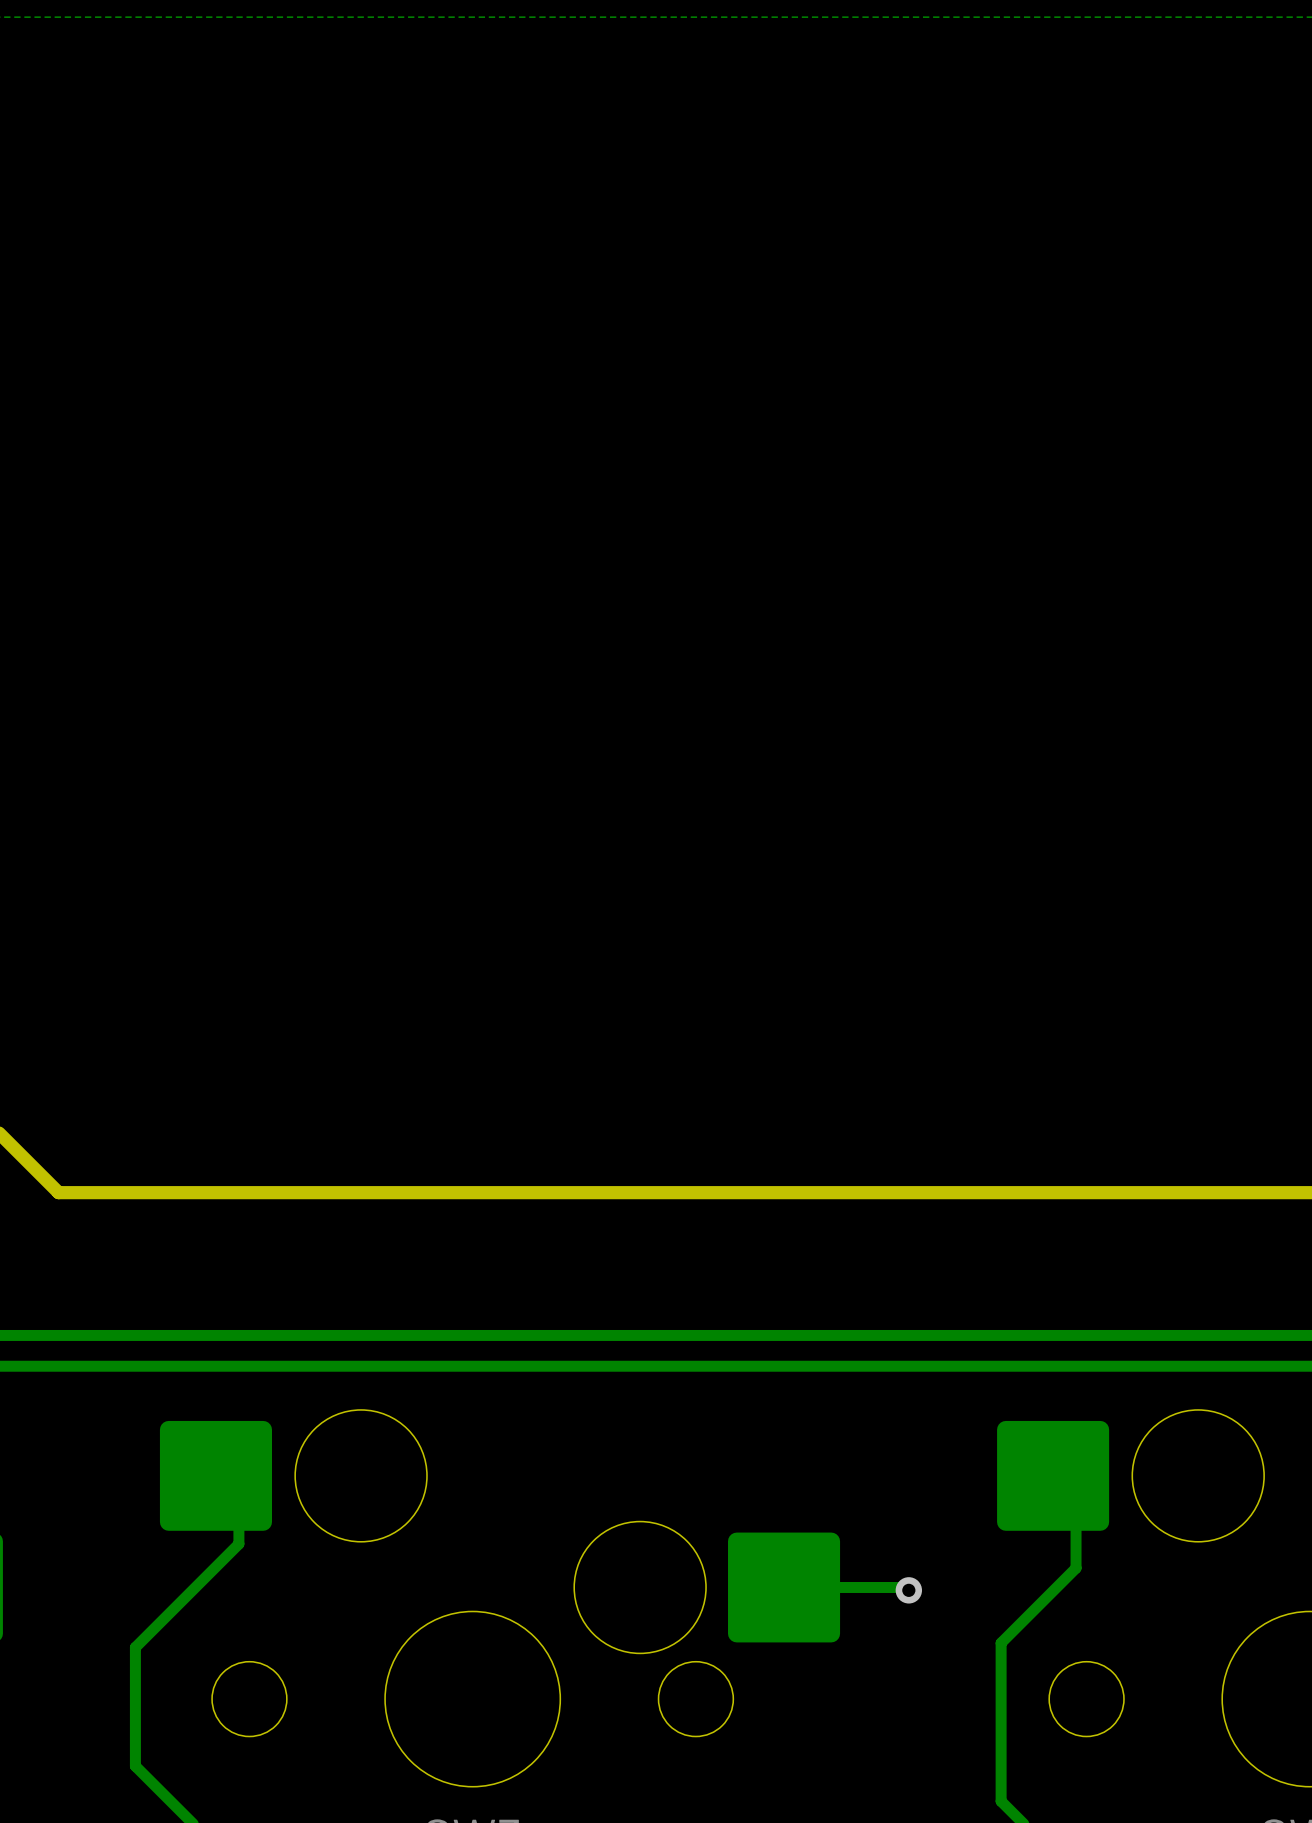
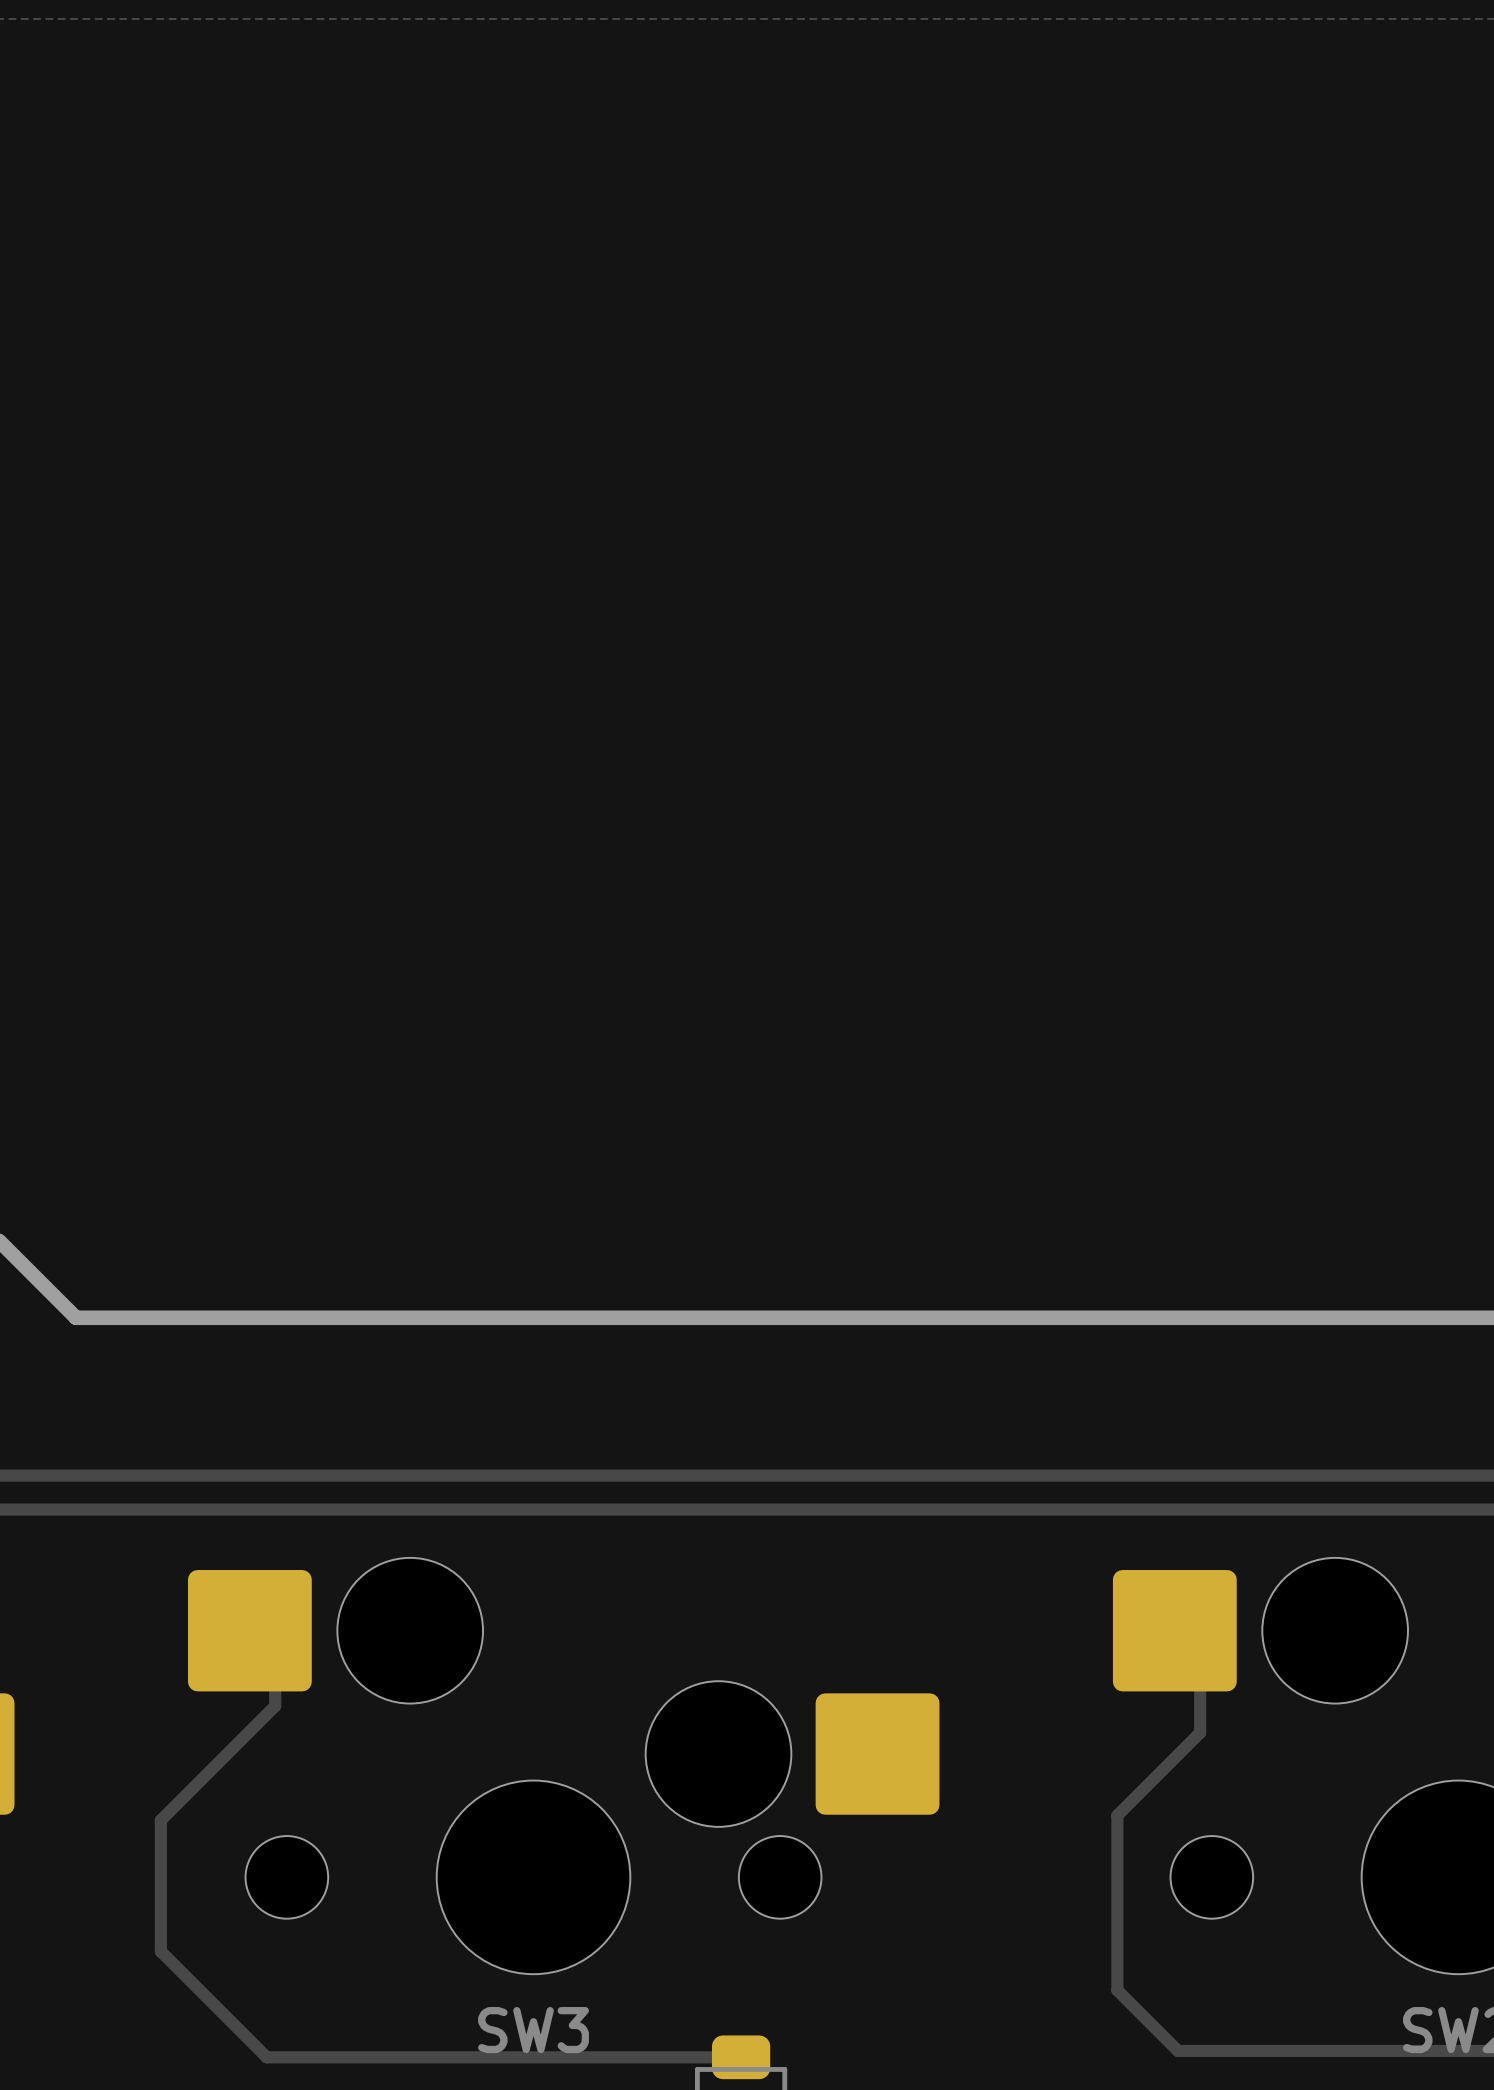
track: (784, 1587) (905, 1587) (908, 1590) -> none
via: (908, 1590) -> none

